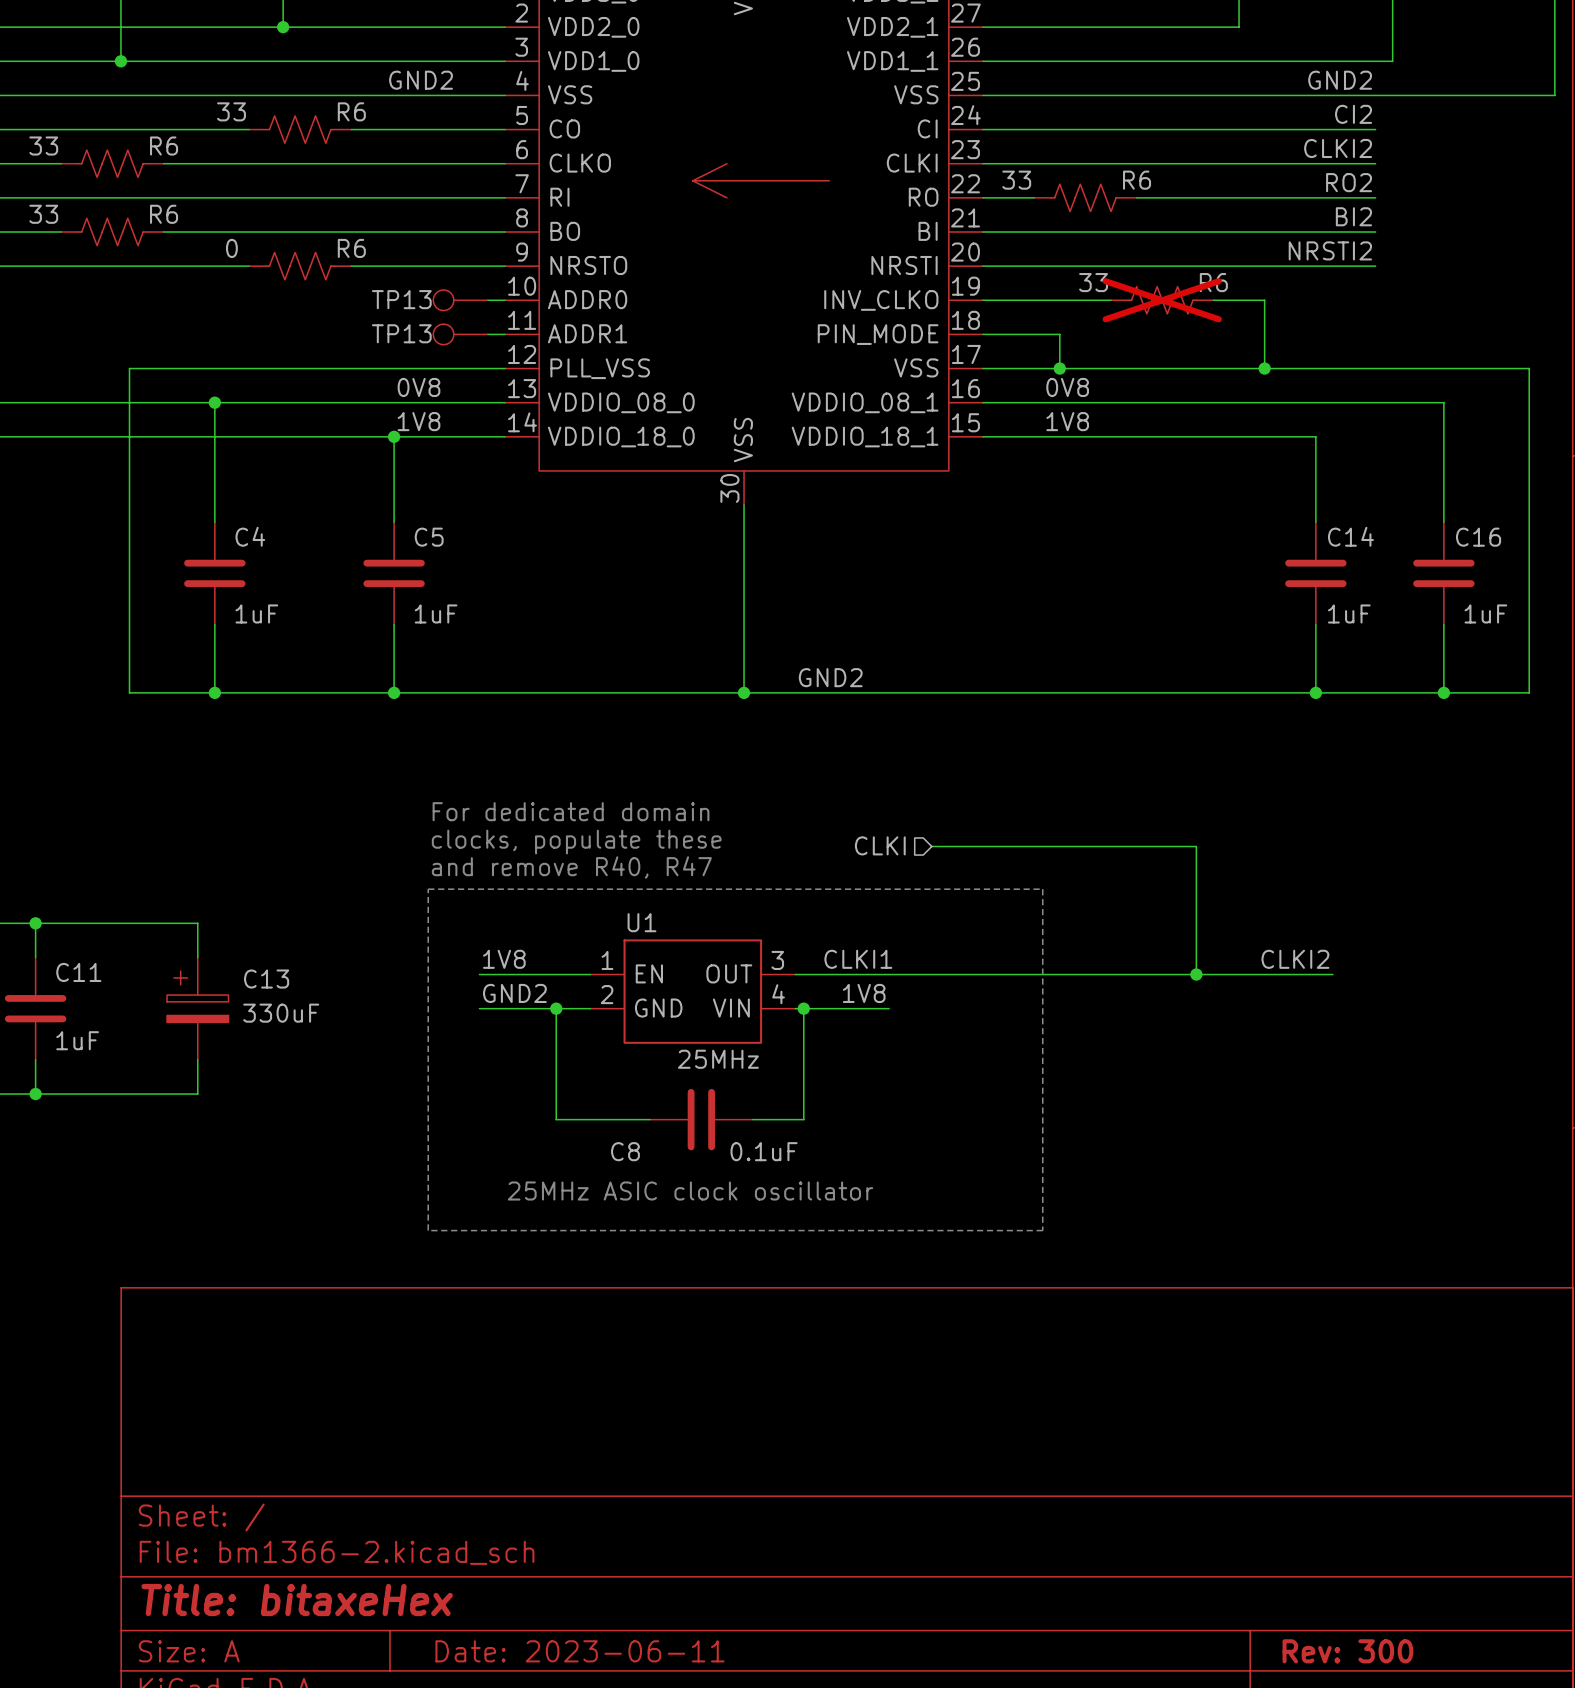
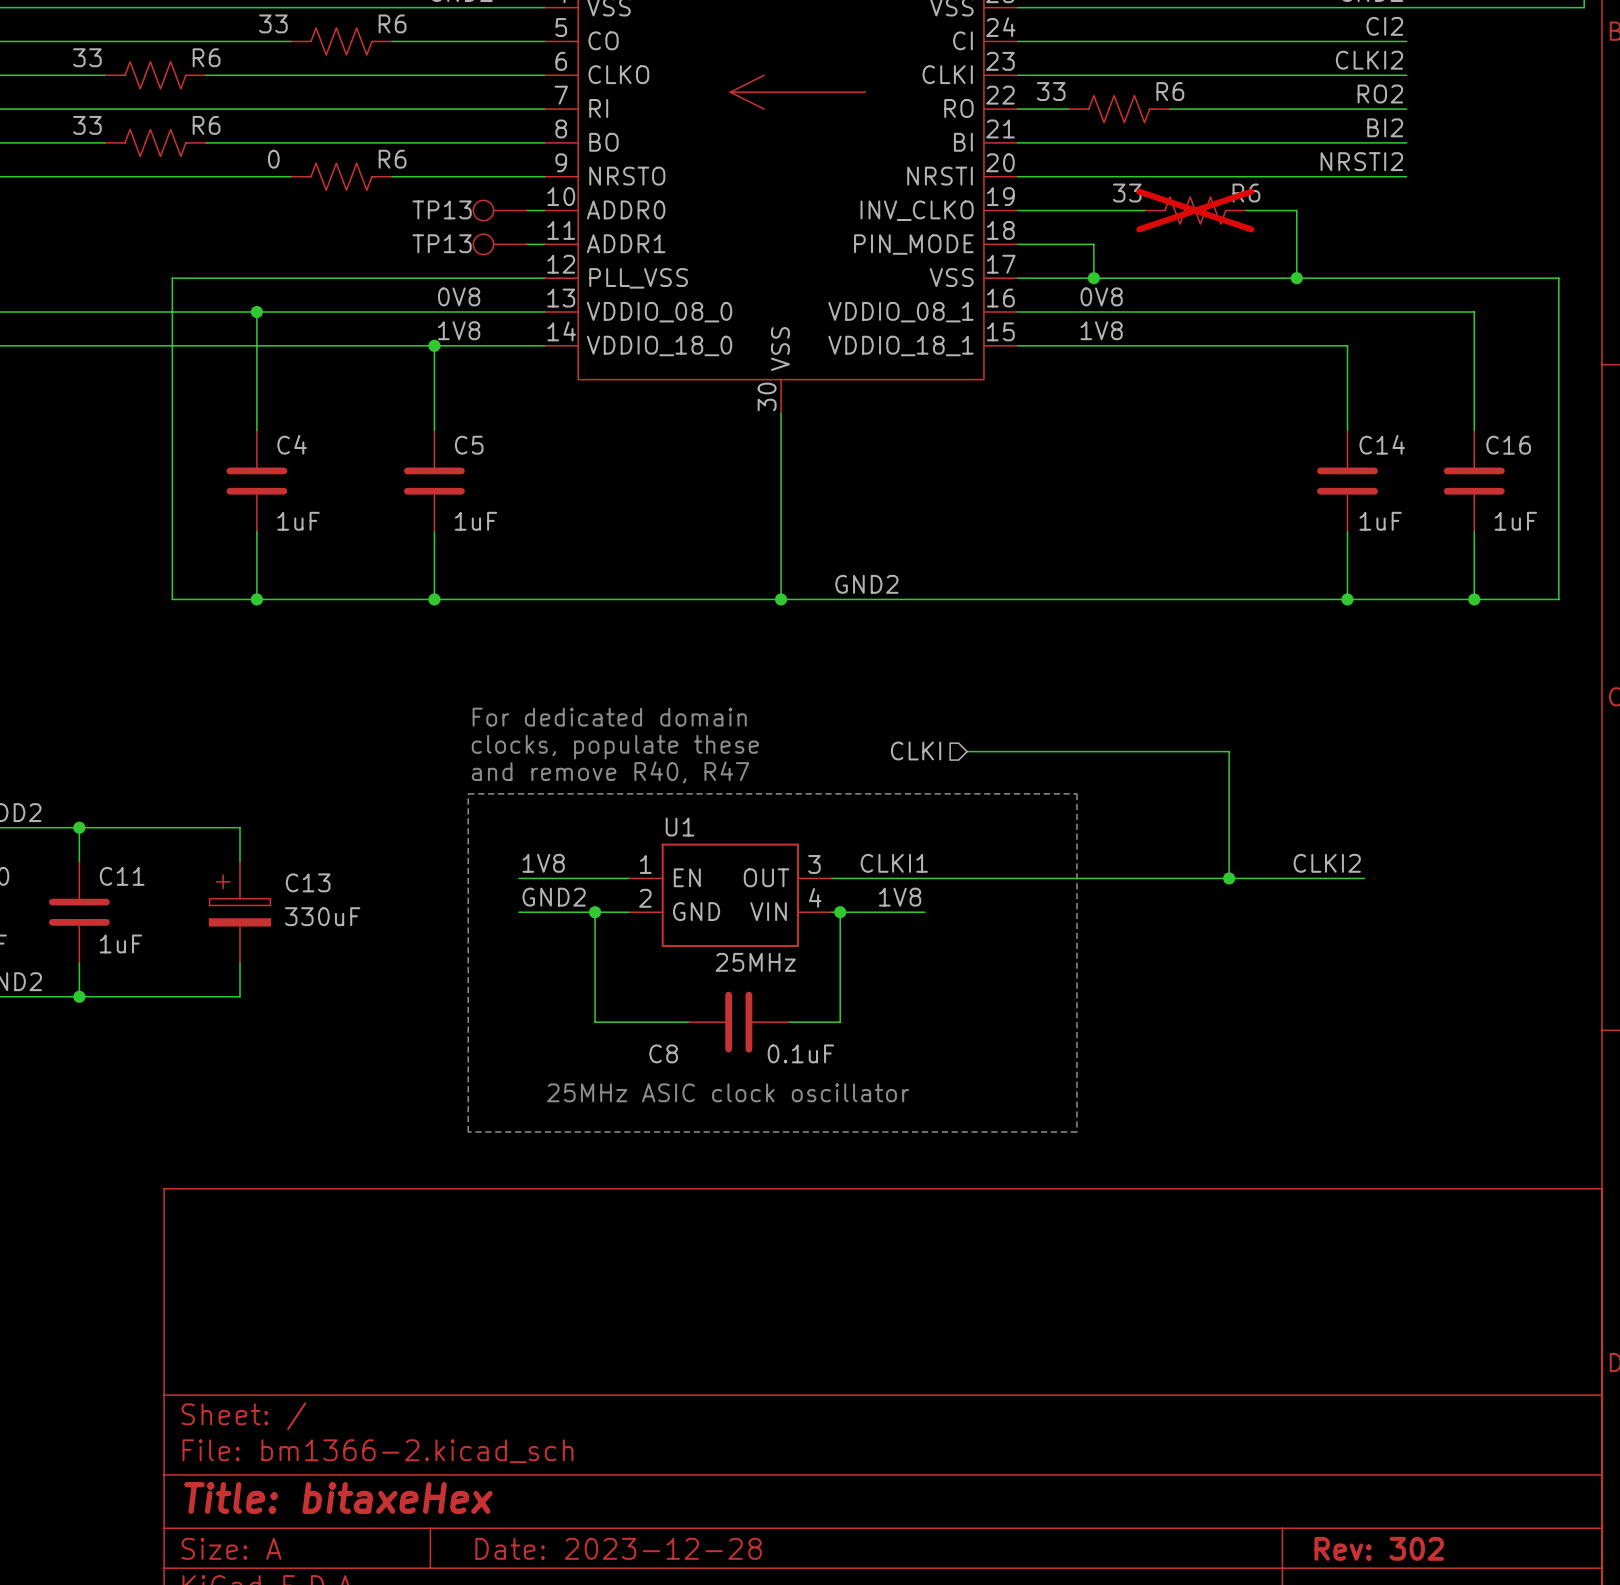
title block: Date: 2023-06-11 (579, 1651) -> Date: 2023-12-28 (618, 1548)
title block: Rev: 300 (1347, 1651) -> Rev: 302 (1379, 1548)

